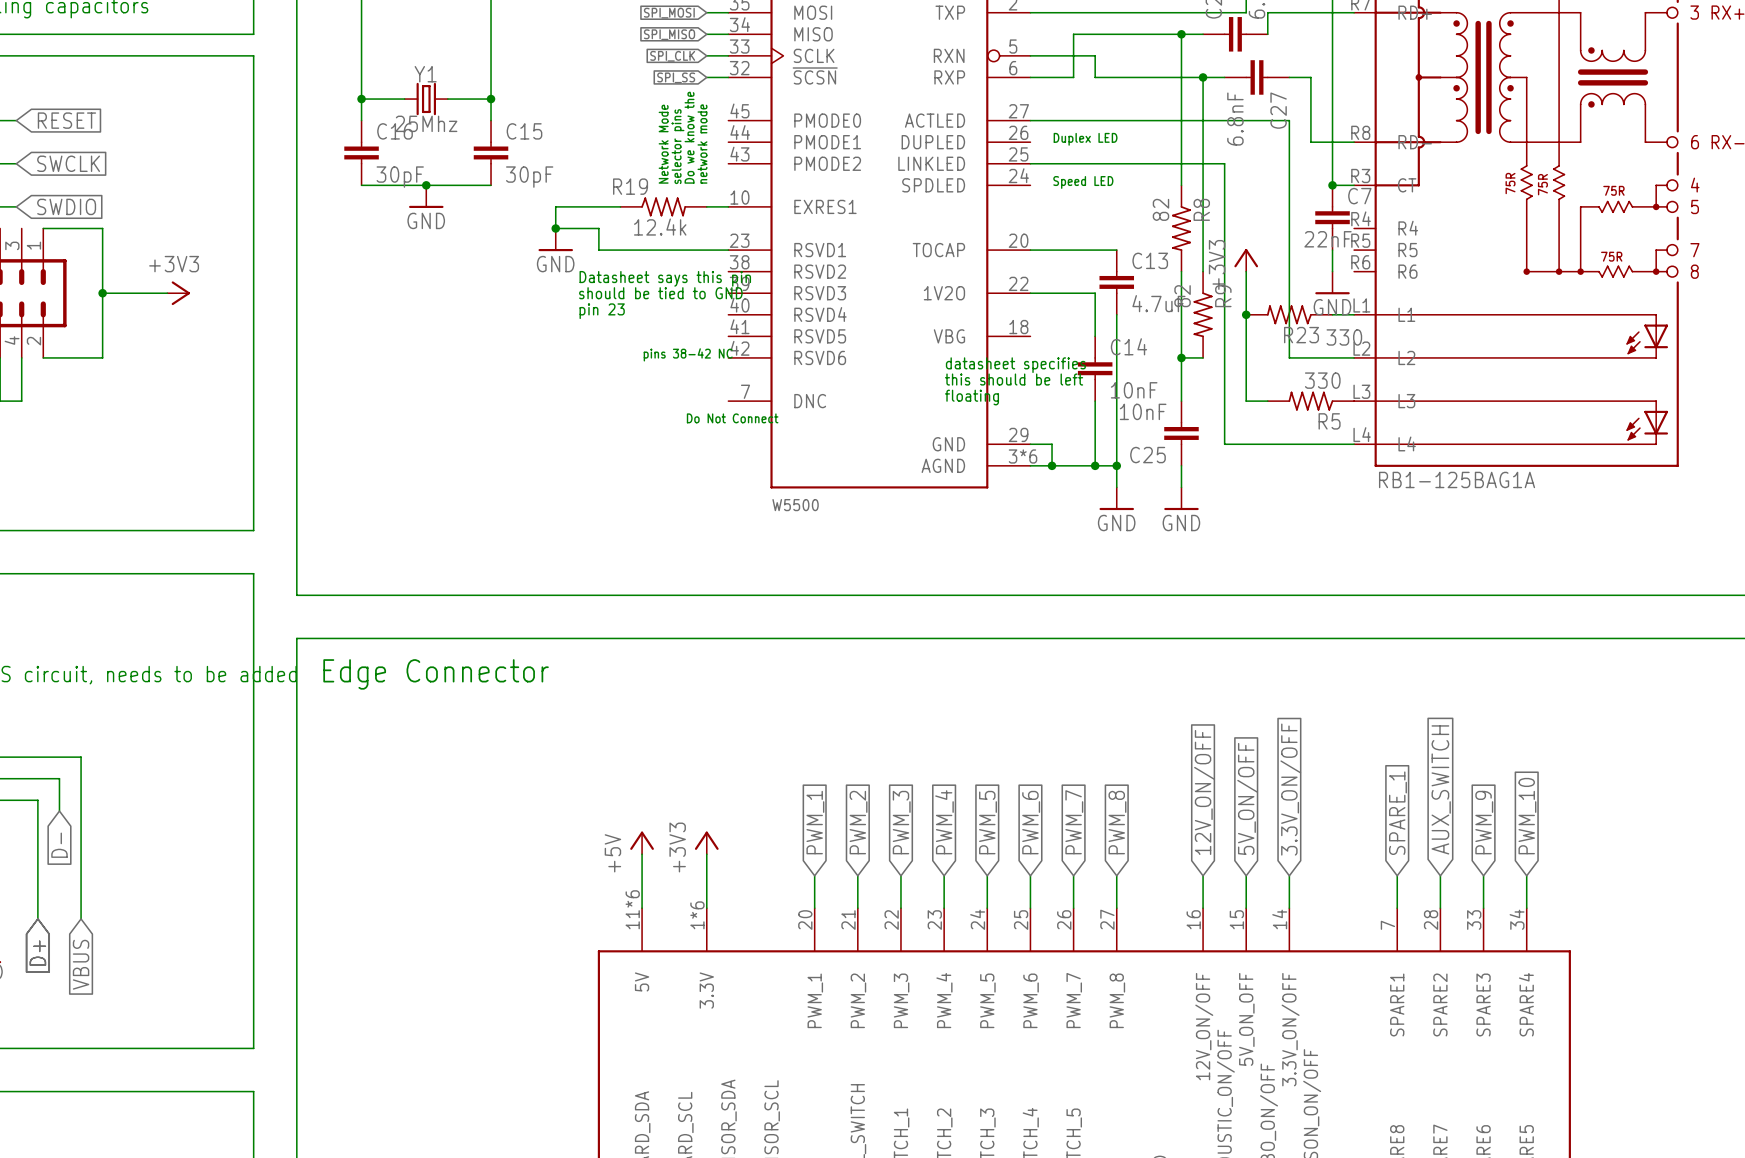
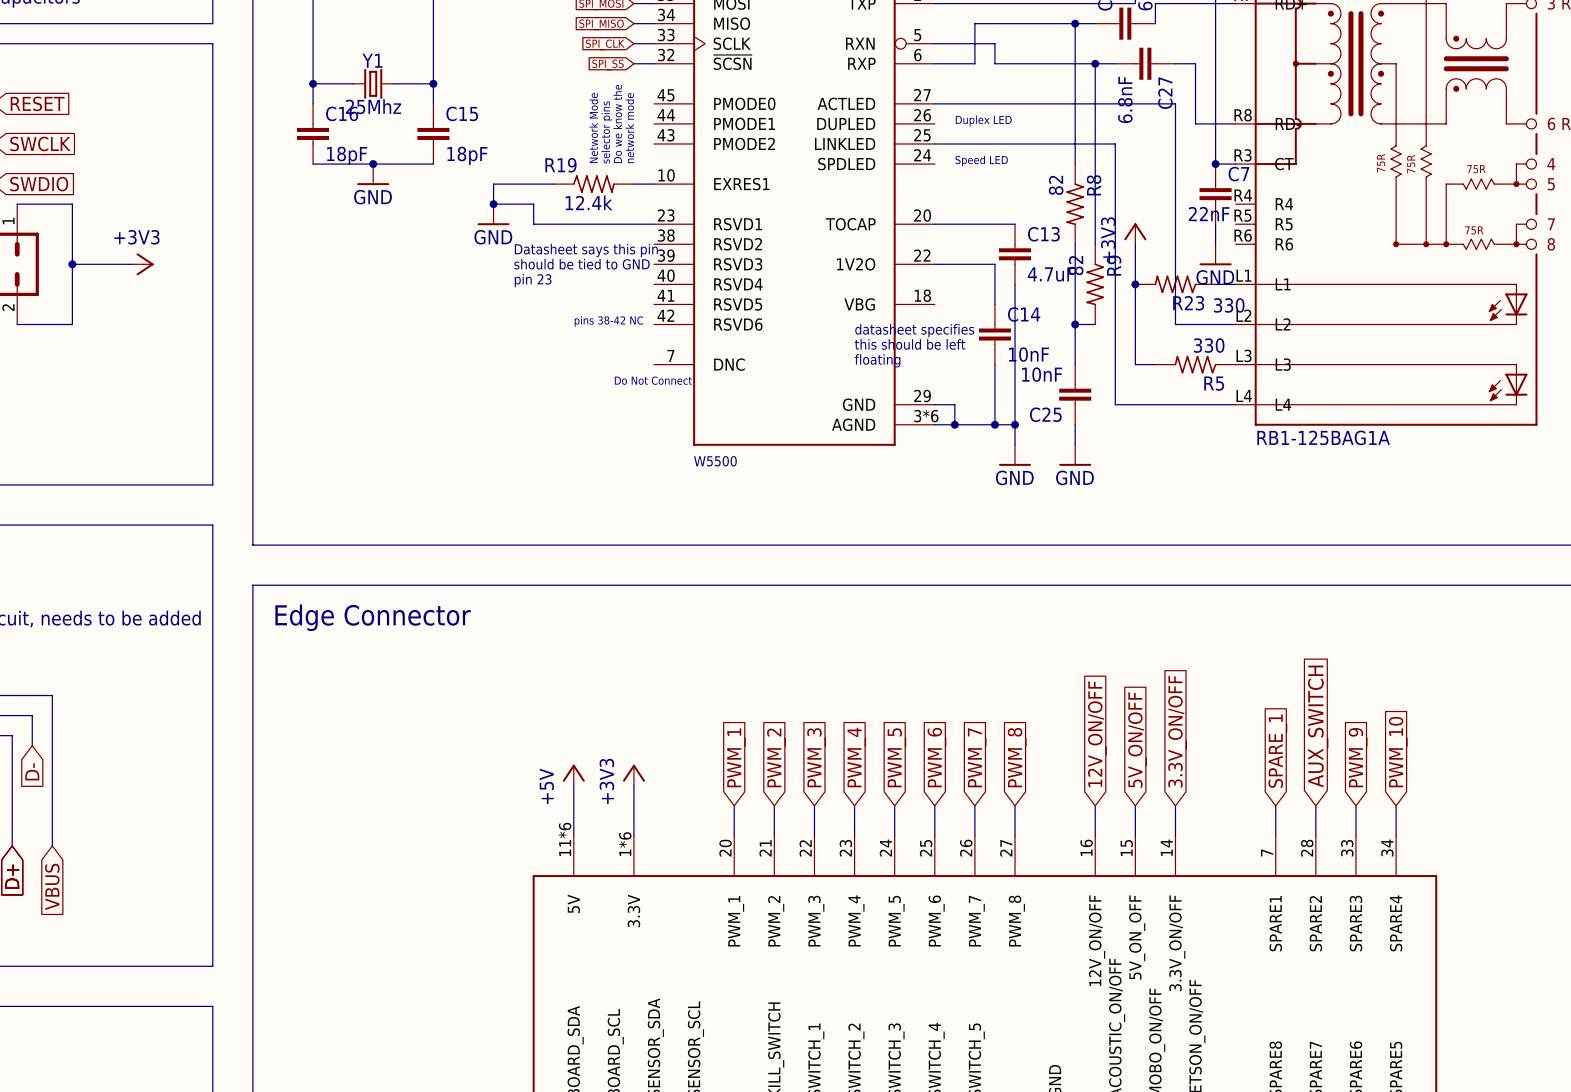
C16 value: 30pF (400, 177) -> 18pF (347, 155)
C15 value: 30pF (529, 177) -> 18pF (467, 155)

